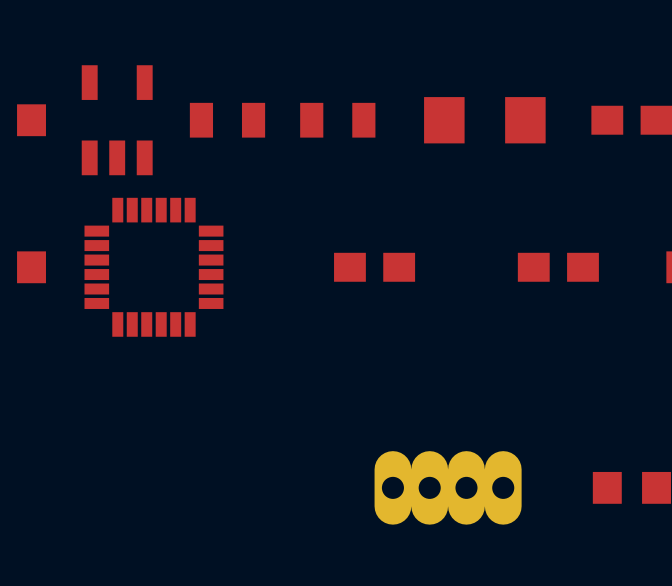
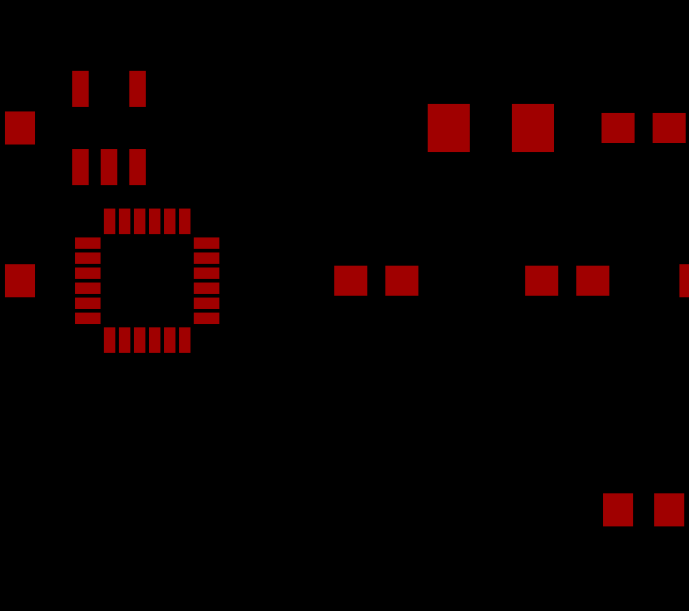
part: (227, 120) -> none
part: (337, 120) -> none
part: (448, 487) -> none

